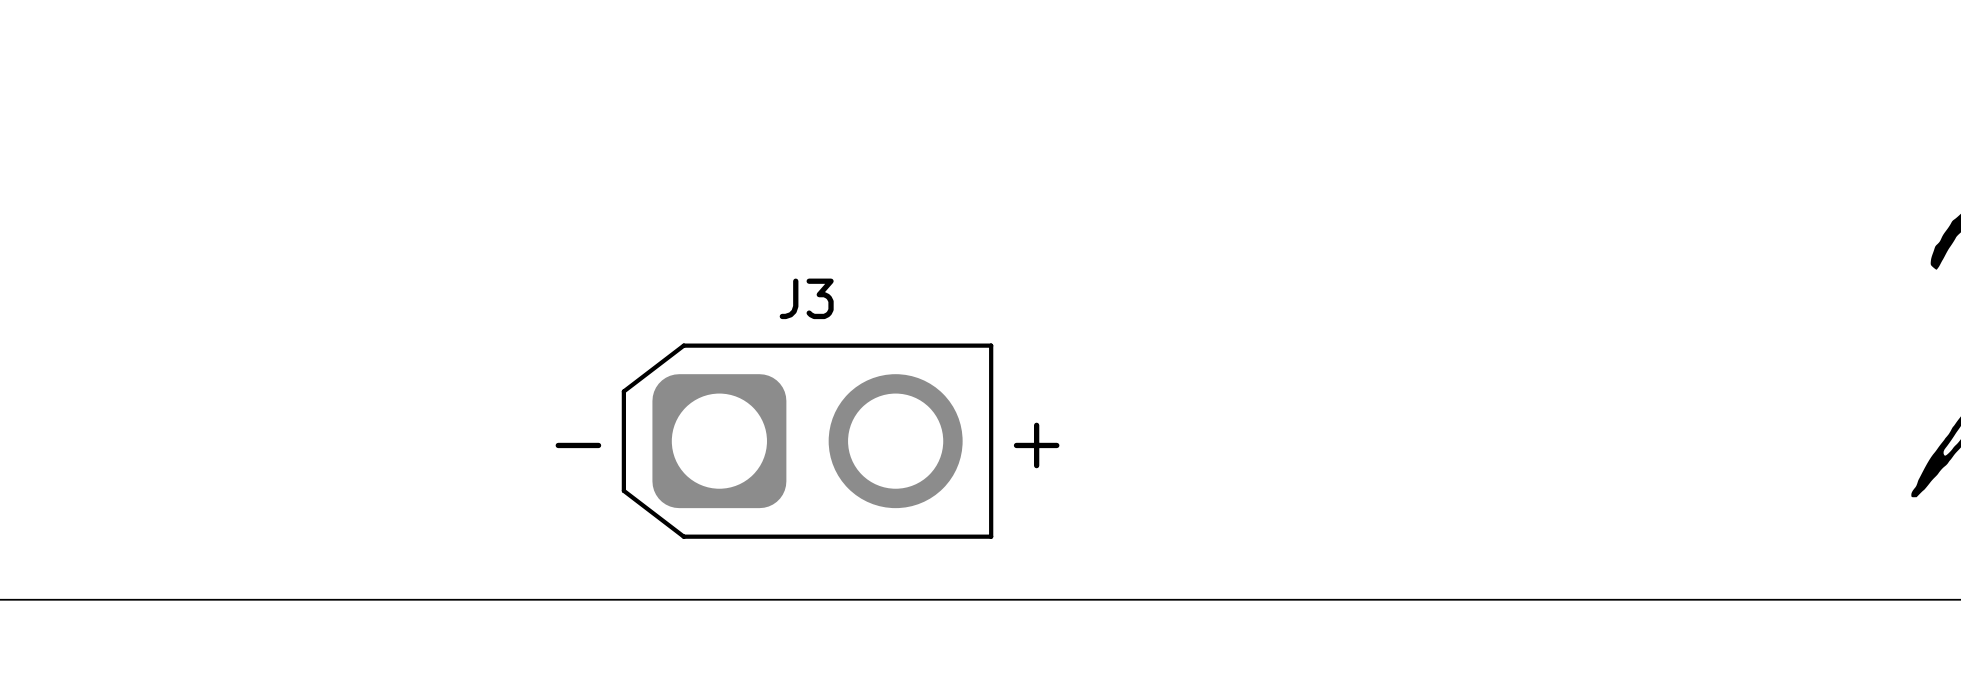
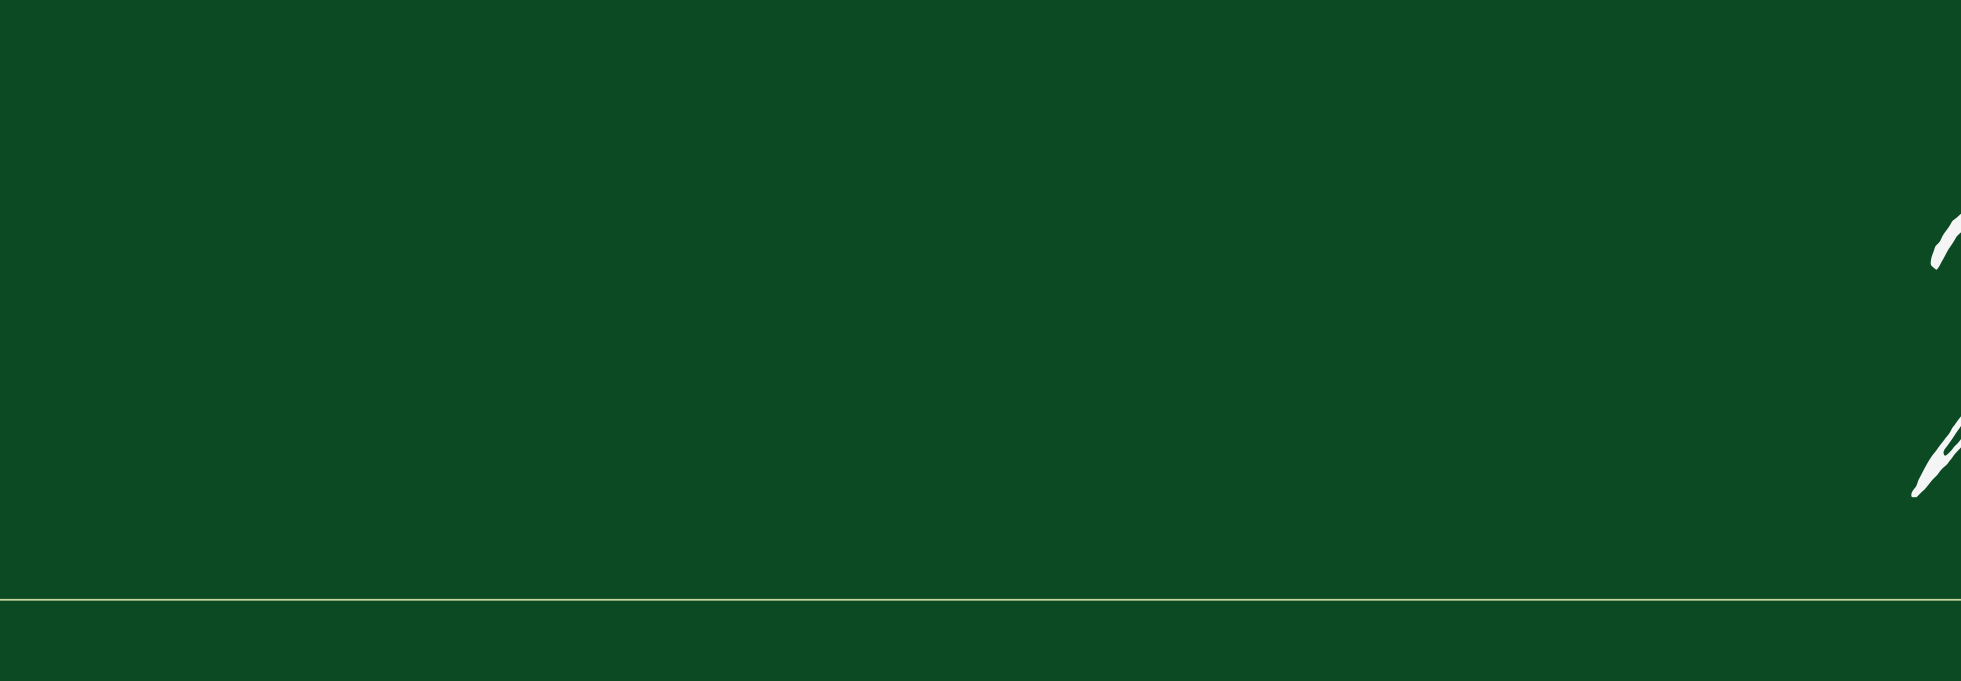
J3: (807, 441) -> none

